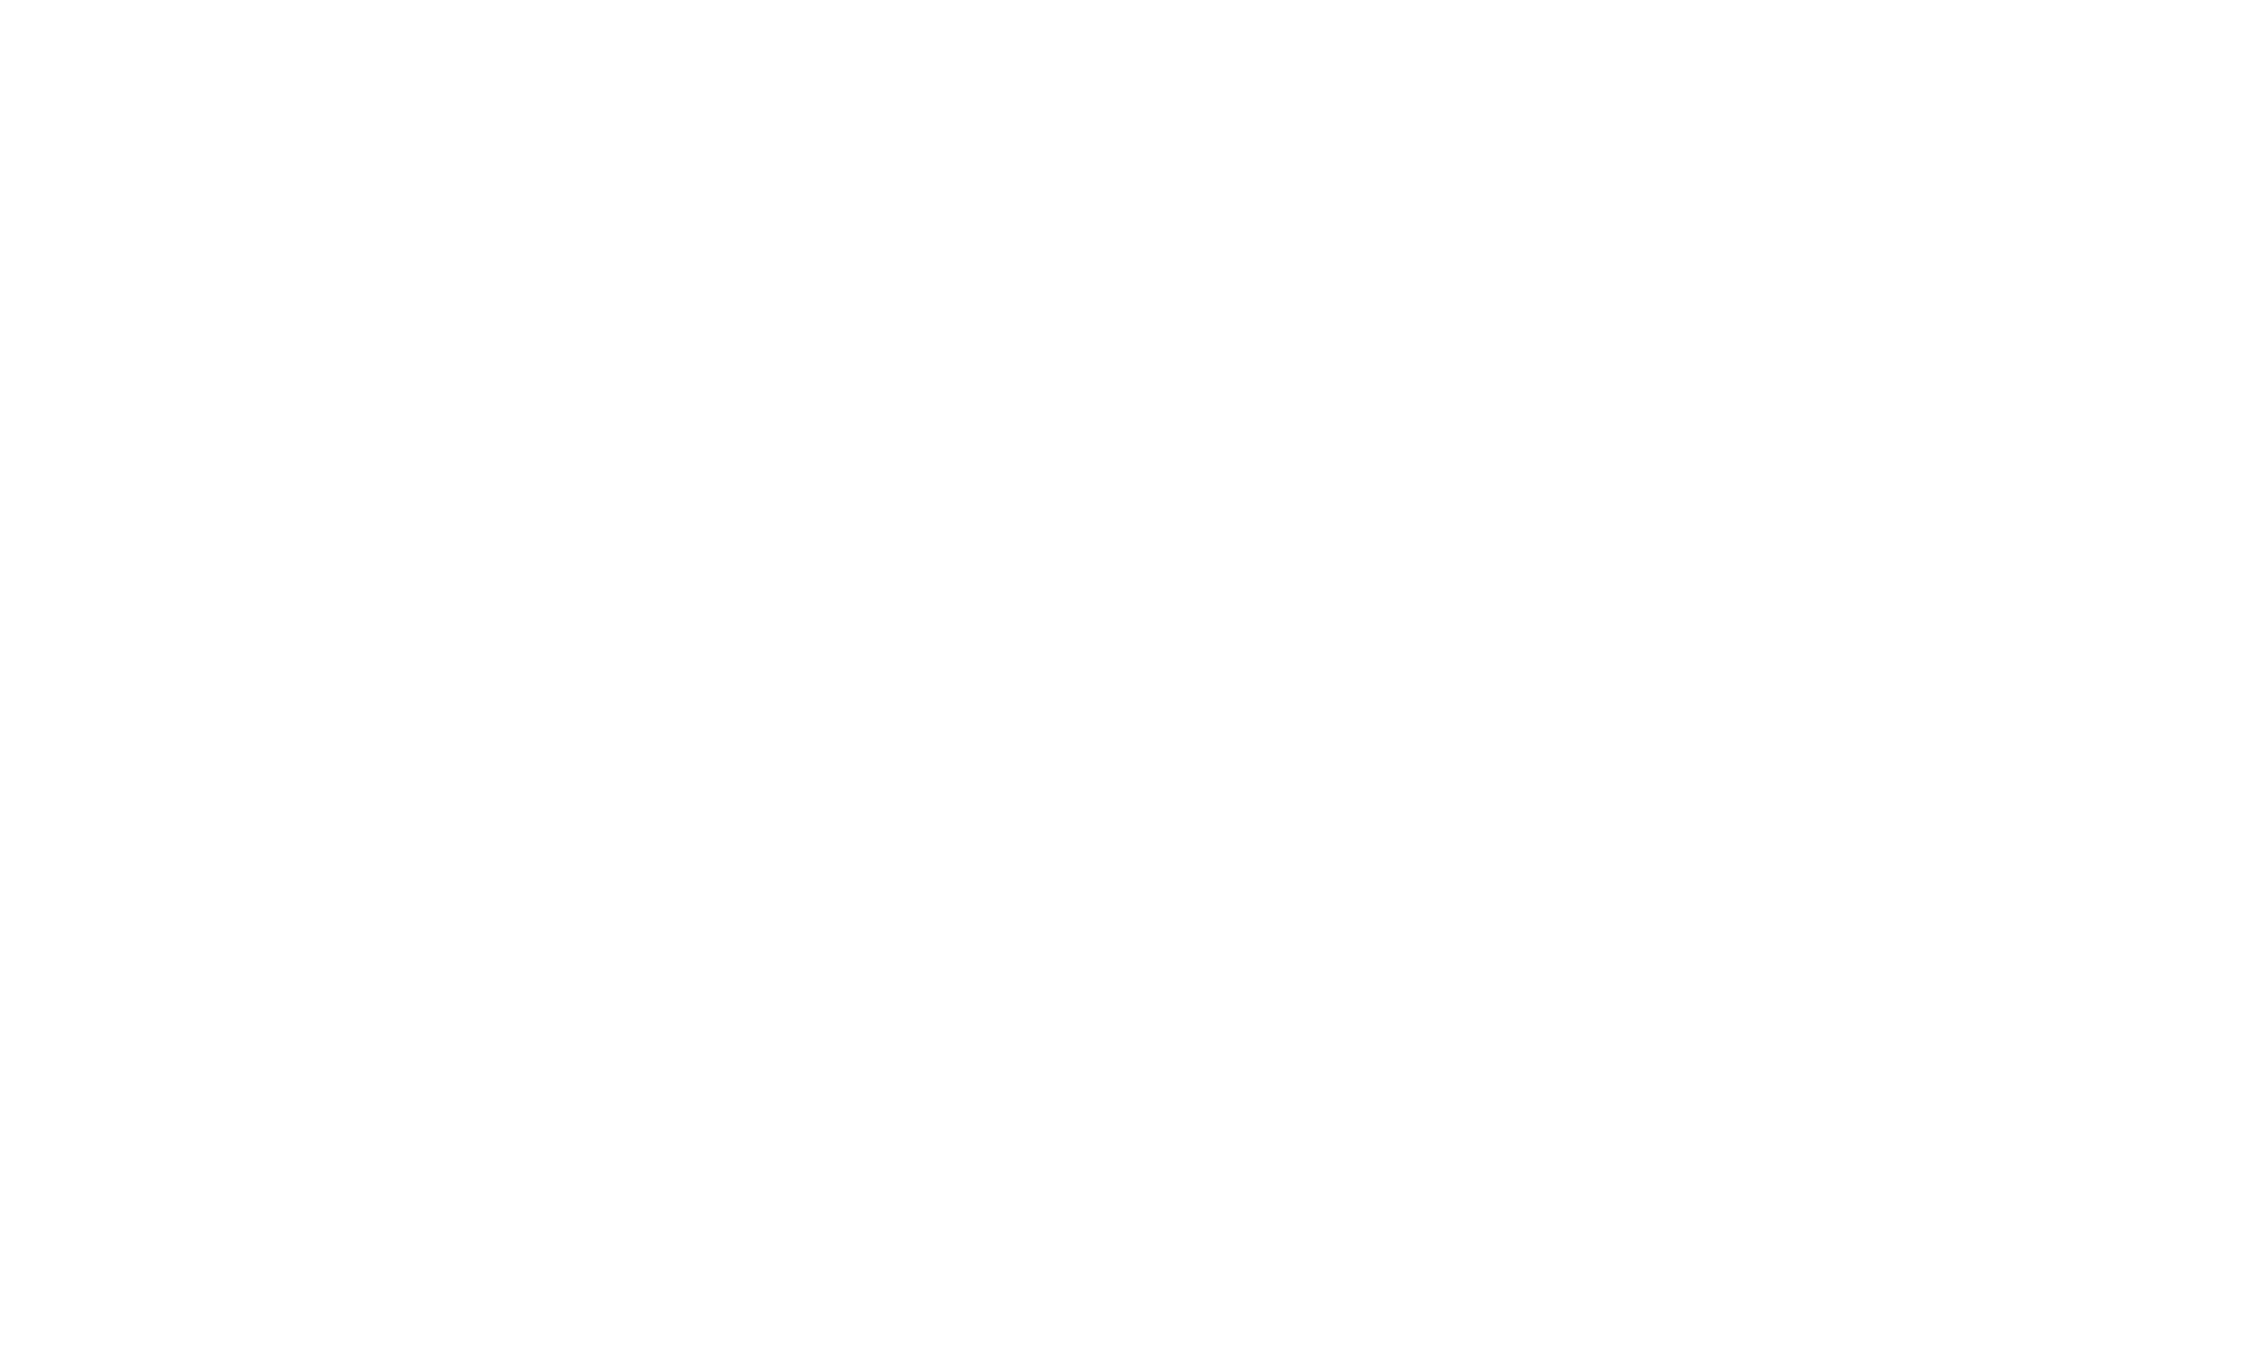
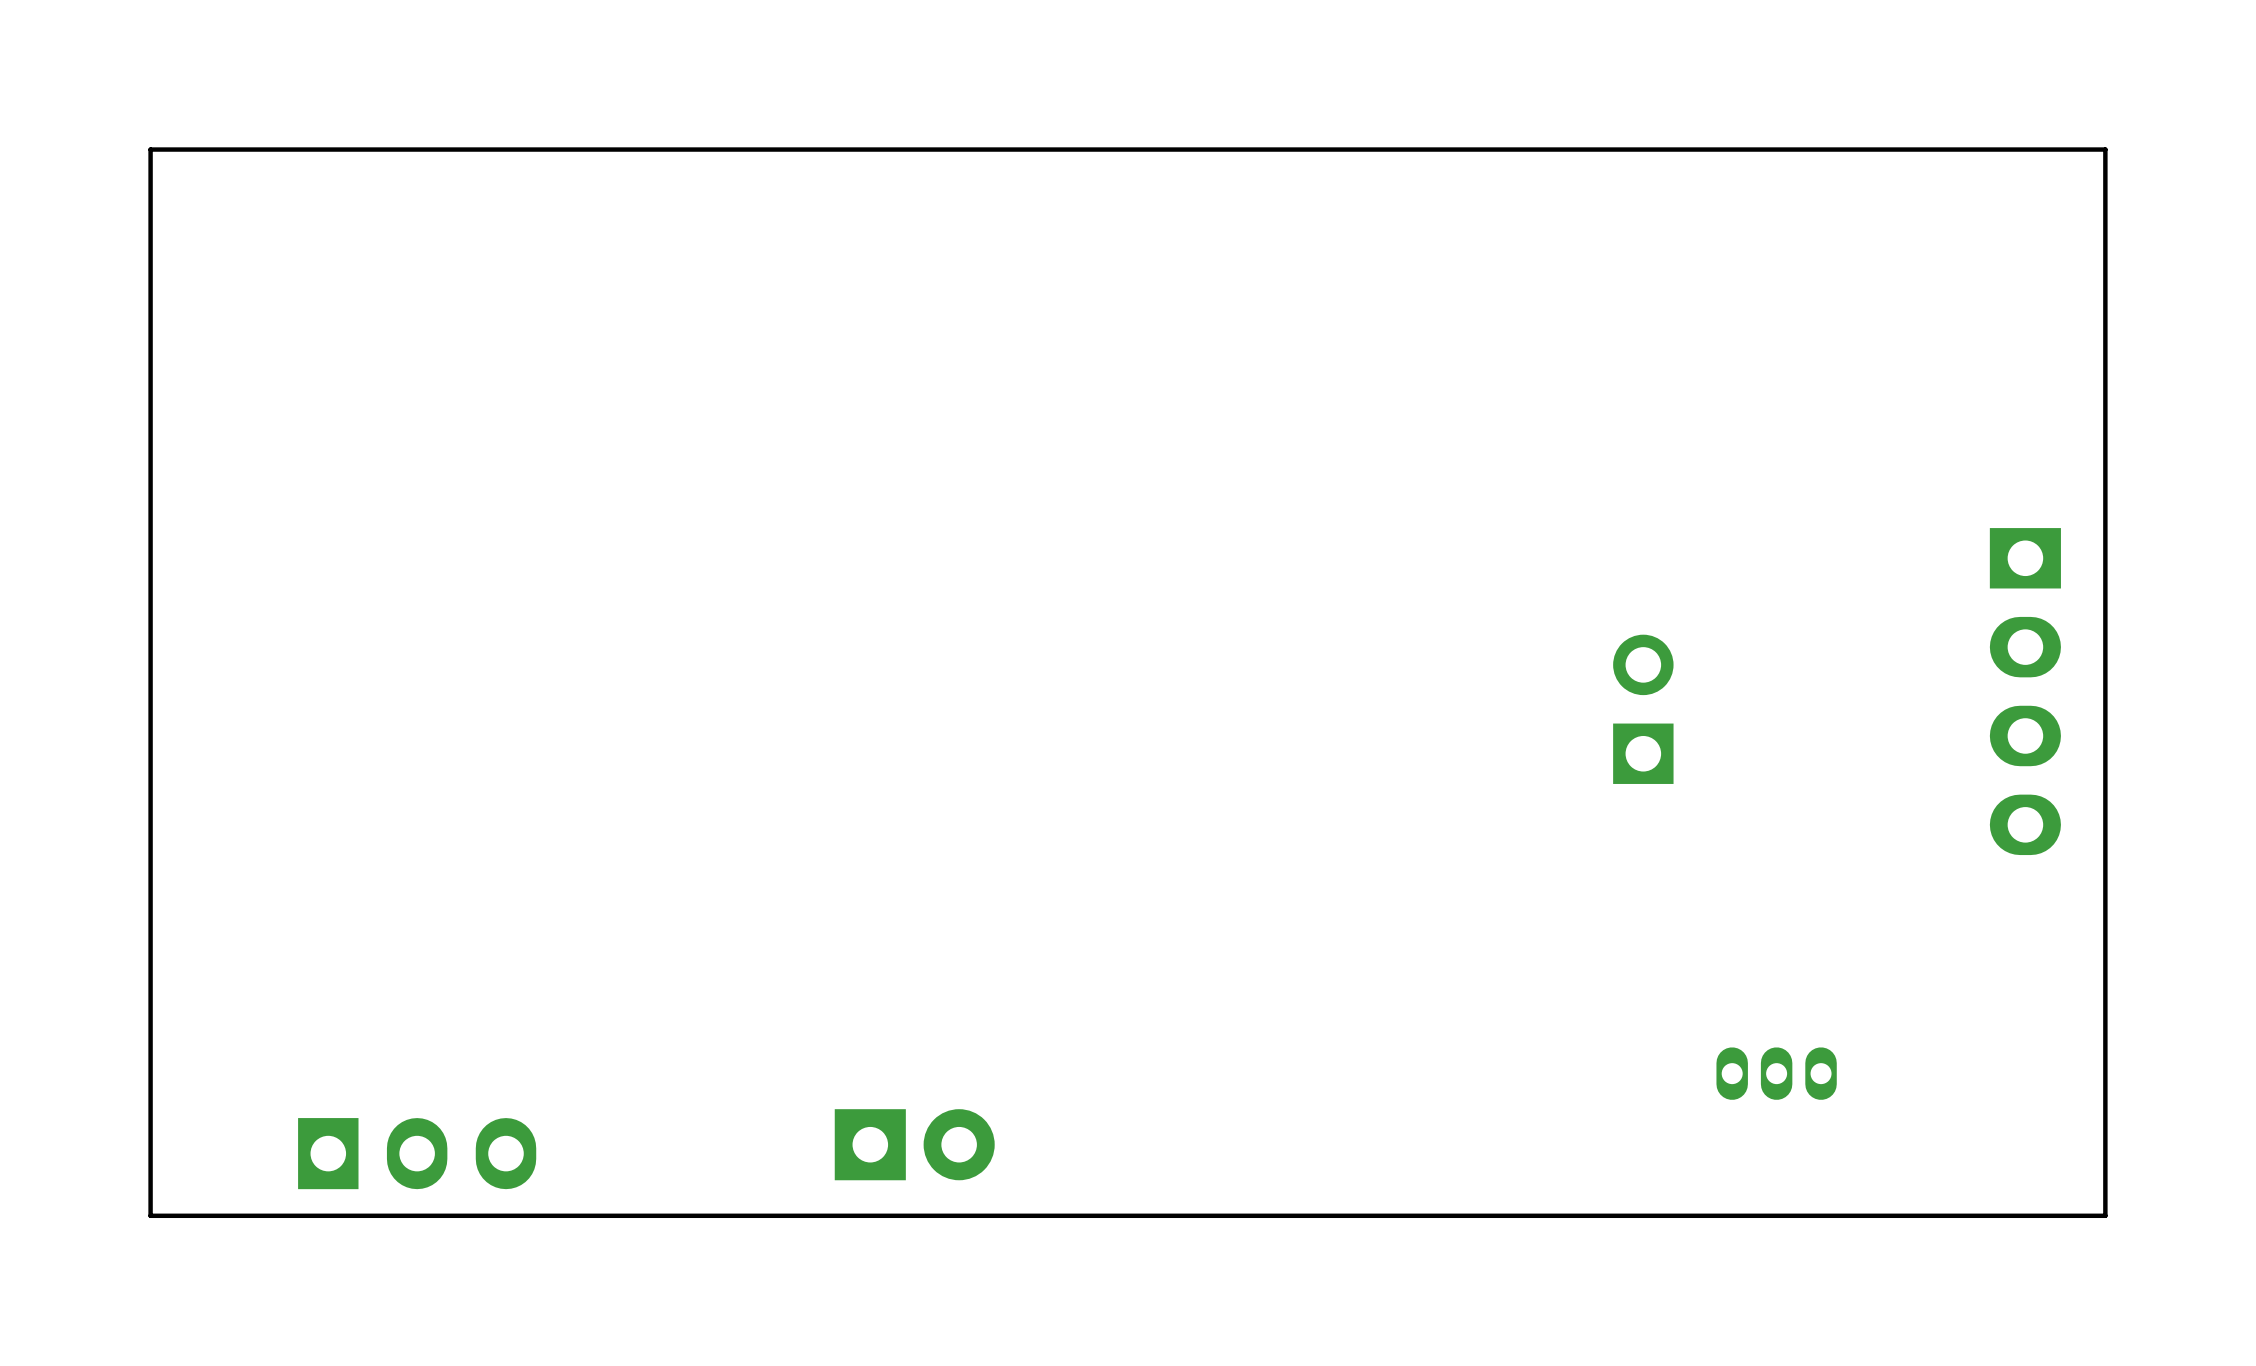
board edge: none -> (2105, 149) (2105, 1215) (150, 1215) (150, 149) (2105, 149)
part: none -> (2025, 691)
part: none -> (1643, 709)
part: none -> (1776, 1073)
part: none -> (914, 1144)
part: none -> (417, 1153)

